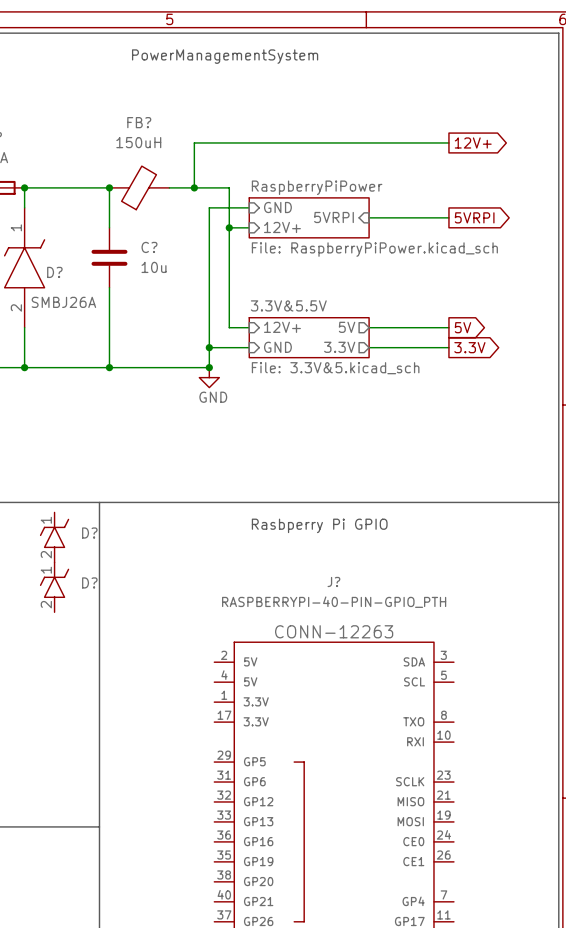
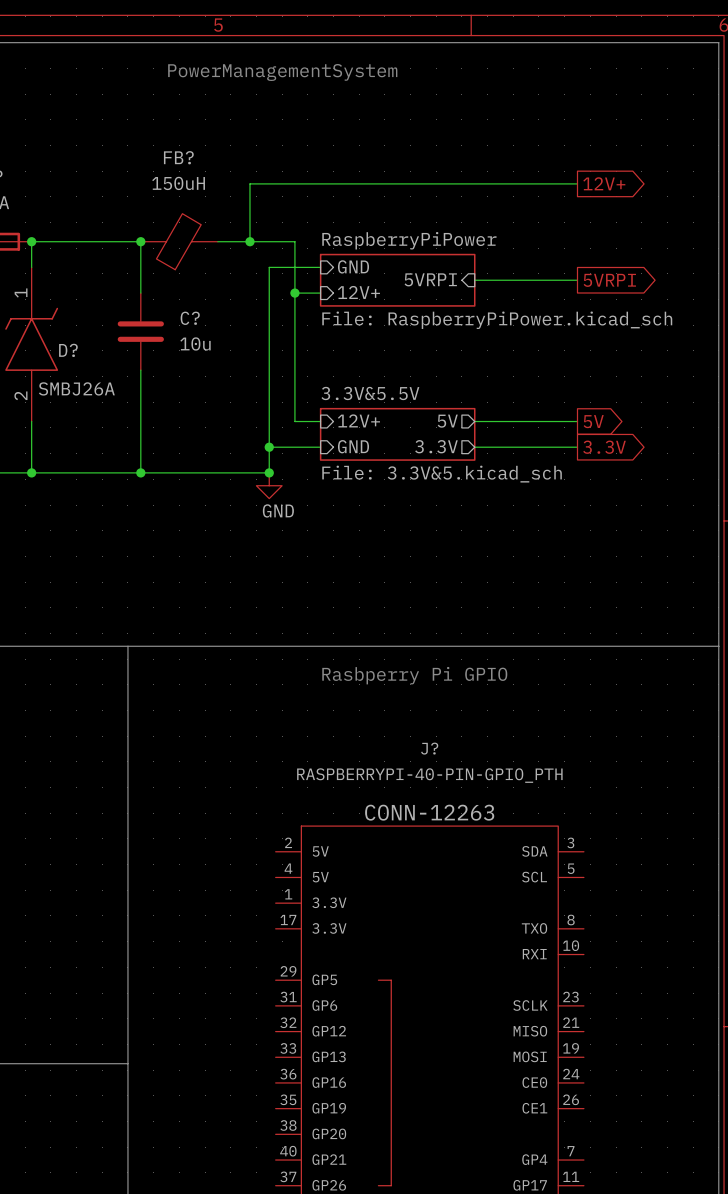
D?: (54, 537) -> none
D?: (54, 587) -> none

